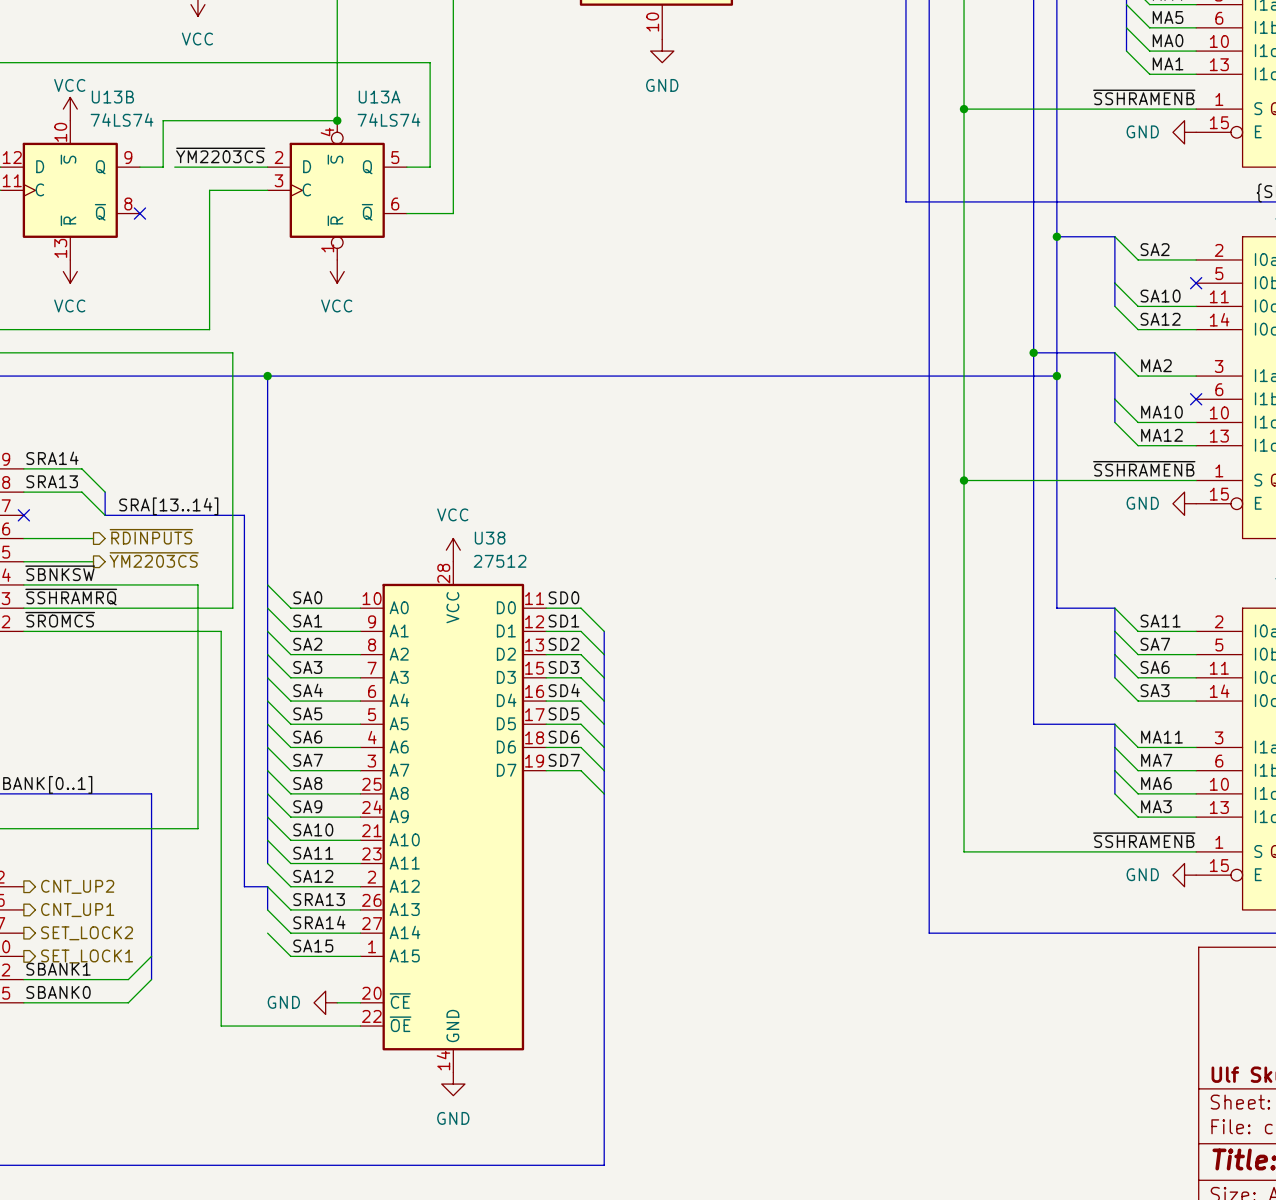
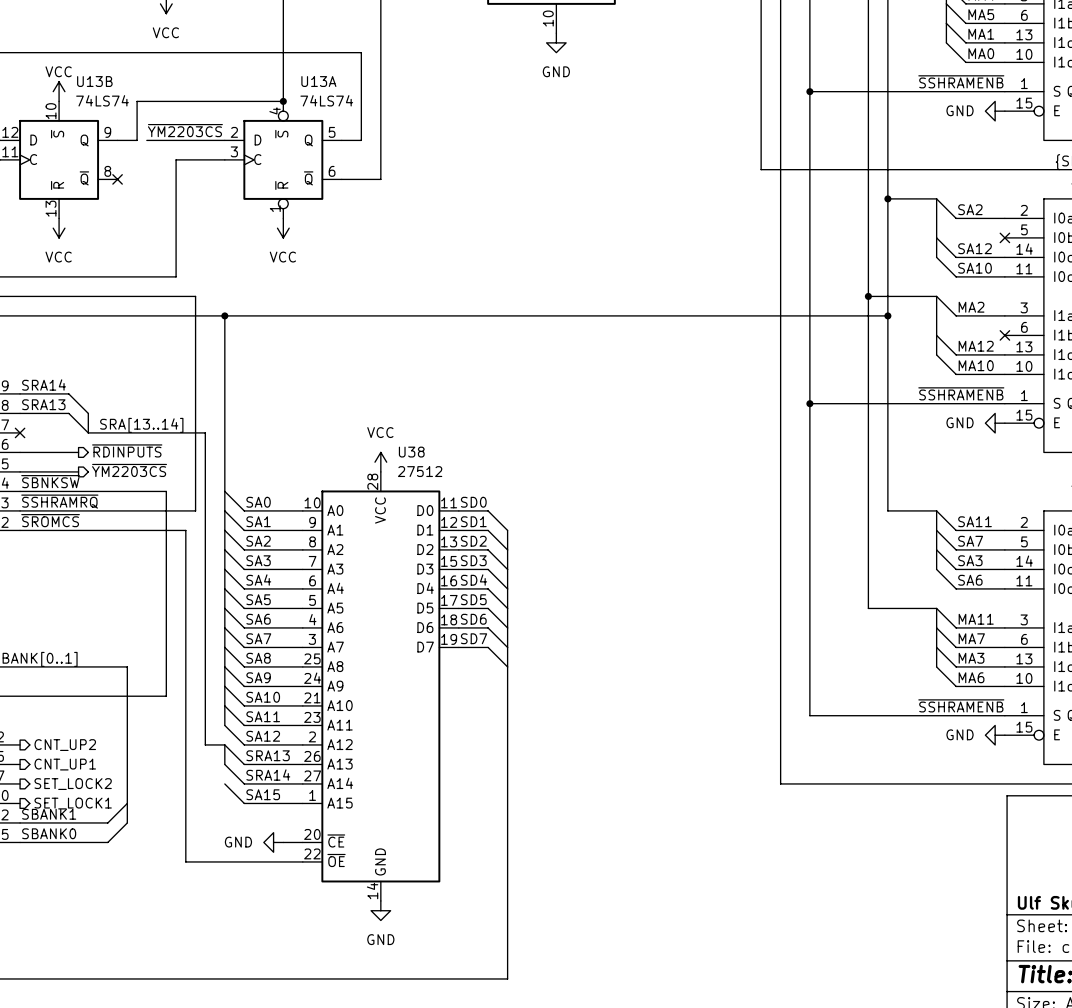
label: MA0 (1168, 40) -> MA1 (981, 34)
part pin number: 10 (1219, 41) -> 13 (1024, 34)
label: MA1 (1168, 63) -> MA0 (981, 53)
part pin number: 13 (1219, 64) -> 10 (1024, 54)
label: SA10 (1160, 296) -> SA12 (975, 248)
part pin number: 11 (1219, 296) -> 14 (1024, 249)
label: SA12 (1160, 319) -> SA10 (975, 268)
part pin number: 14 (1219, 319) -> 11 (1024, 268)
label: MA10 (1161, 412) -> MA12 (976, 346)
part pin number: 10 (1219, 412) -> 13 (1024, 346)
label: MA12 (1161, 435) -> MA10 (976, 365)
part pin number: 13 (1219, 436) -> 10 (1024, 366)
label: SA6 (1155, 667) -> SA3 (970, 560)
part pin number: 11 (1219, 668) -> 14 (1024, 561)
label: SA3 (1155, 690) -> SA6 (970, 580)
part pin number: 14 (1219, 691) -> 11 (1024, 580)
label: MA6 (1156, 783) -> MA3 (971, 658)
part pin number: 10 (1219, 784) -> 13 (1024, 658)
label: MA3 (1156, 806) -> MA6 (971, 677)
part pin number: 13 (1219, 807) -> 10 (1024, 678)

